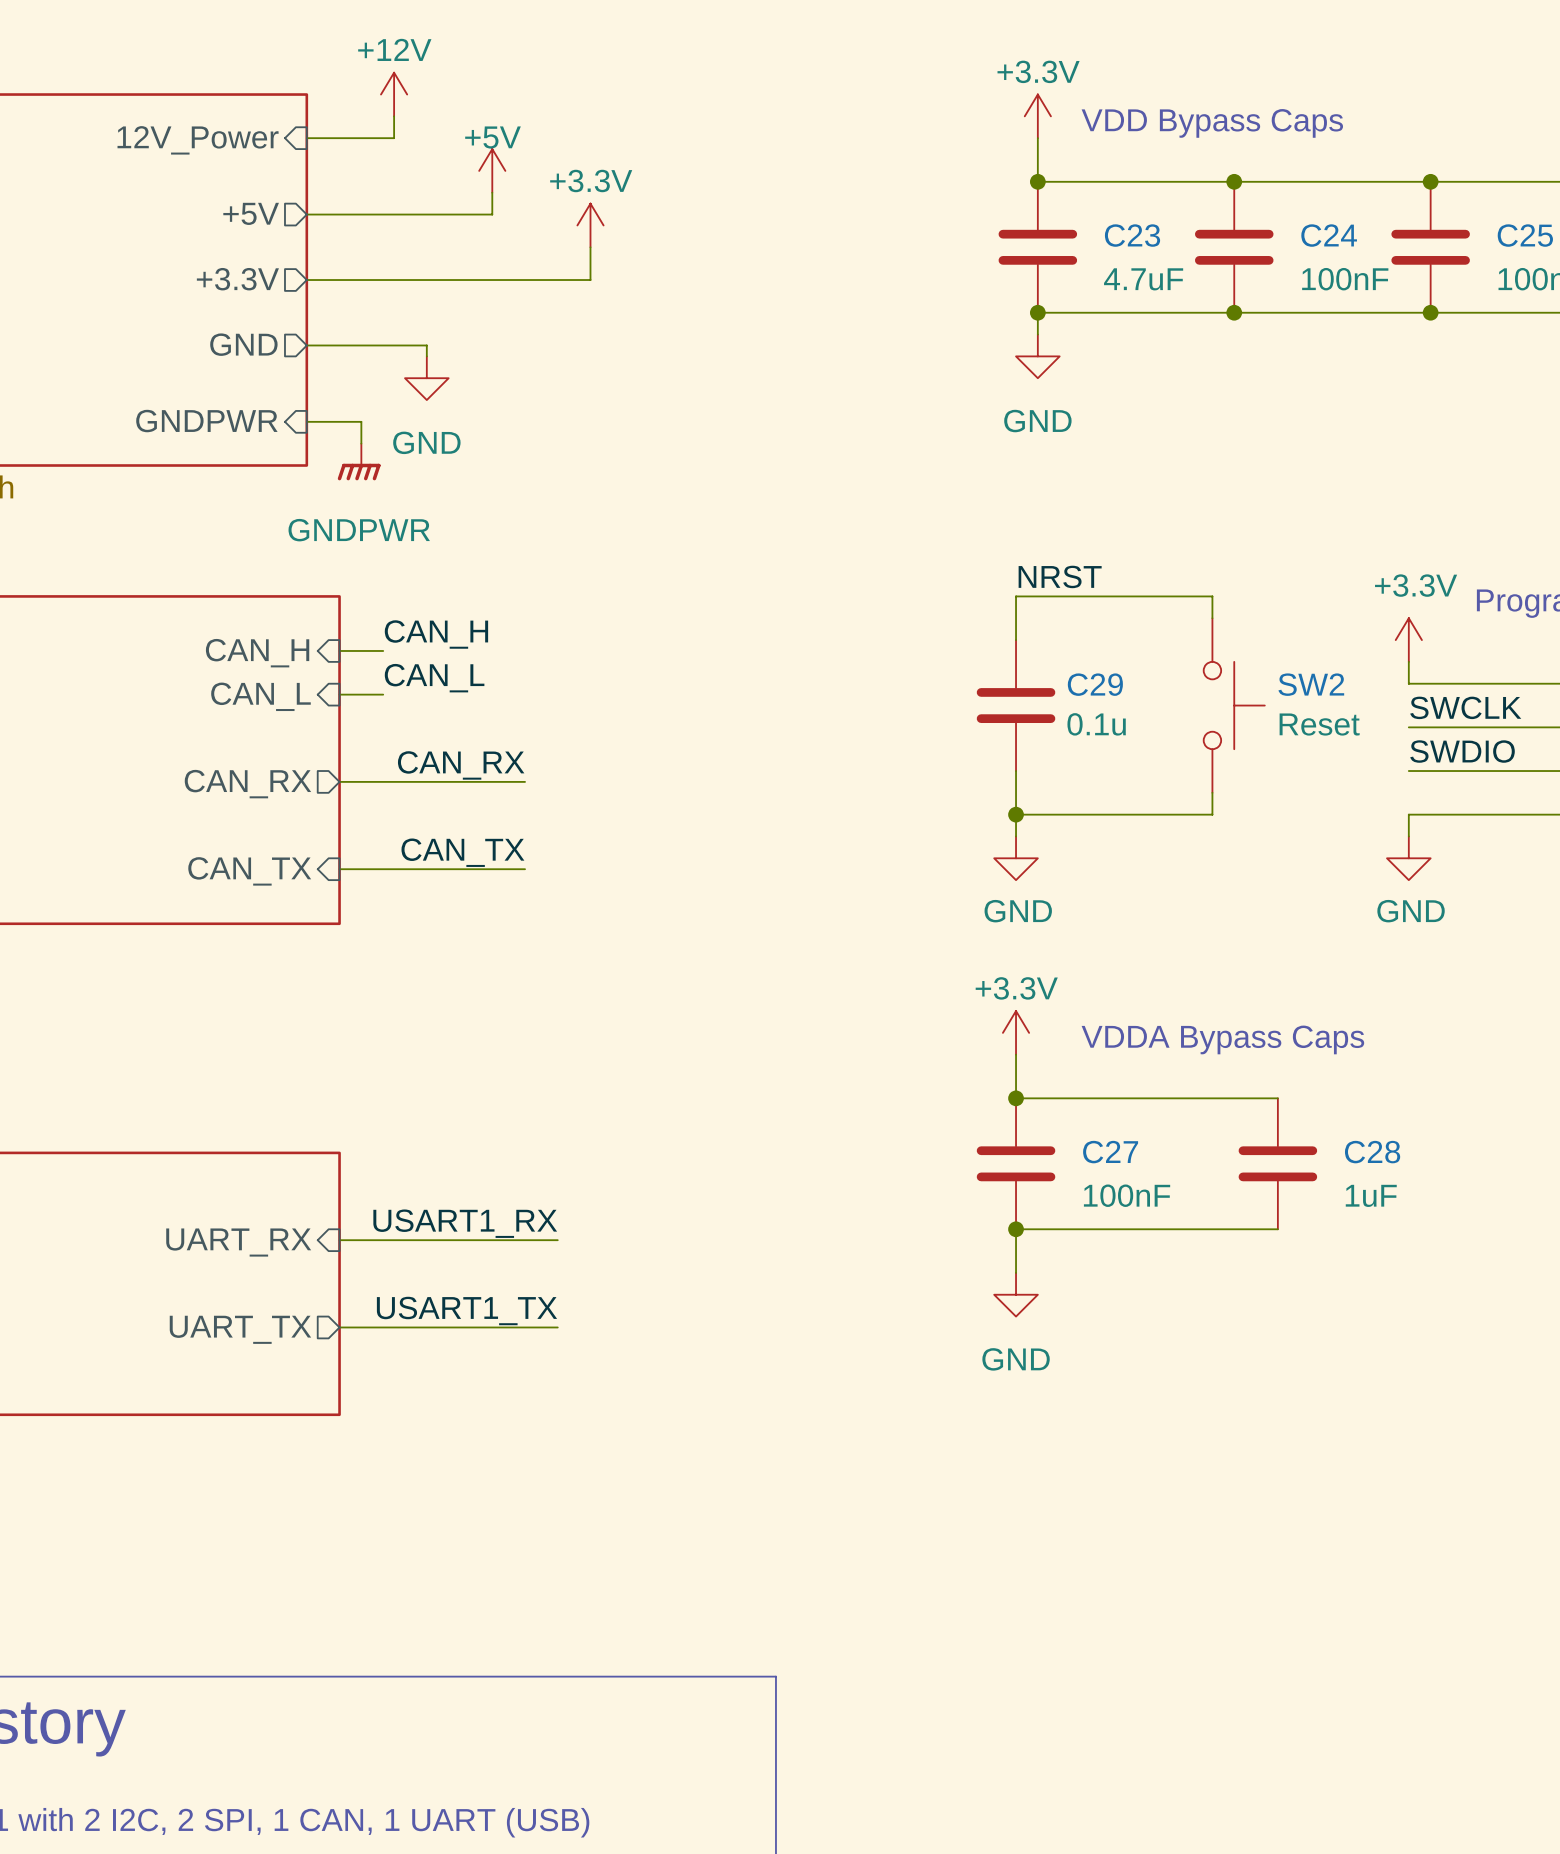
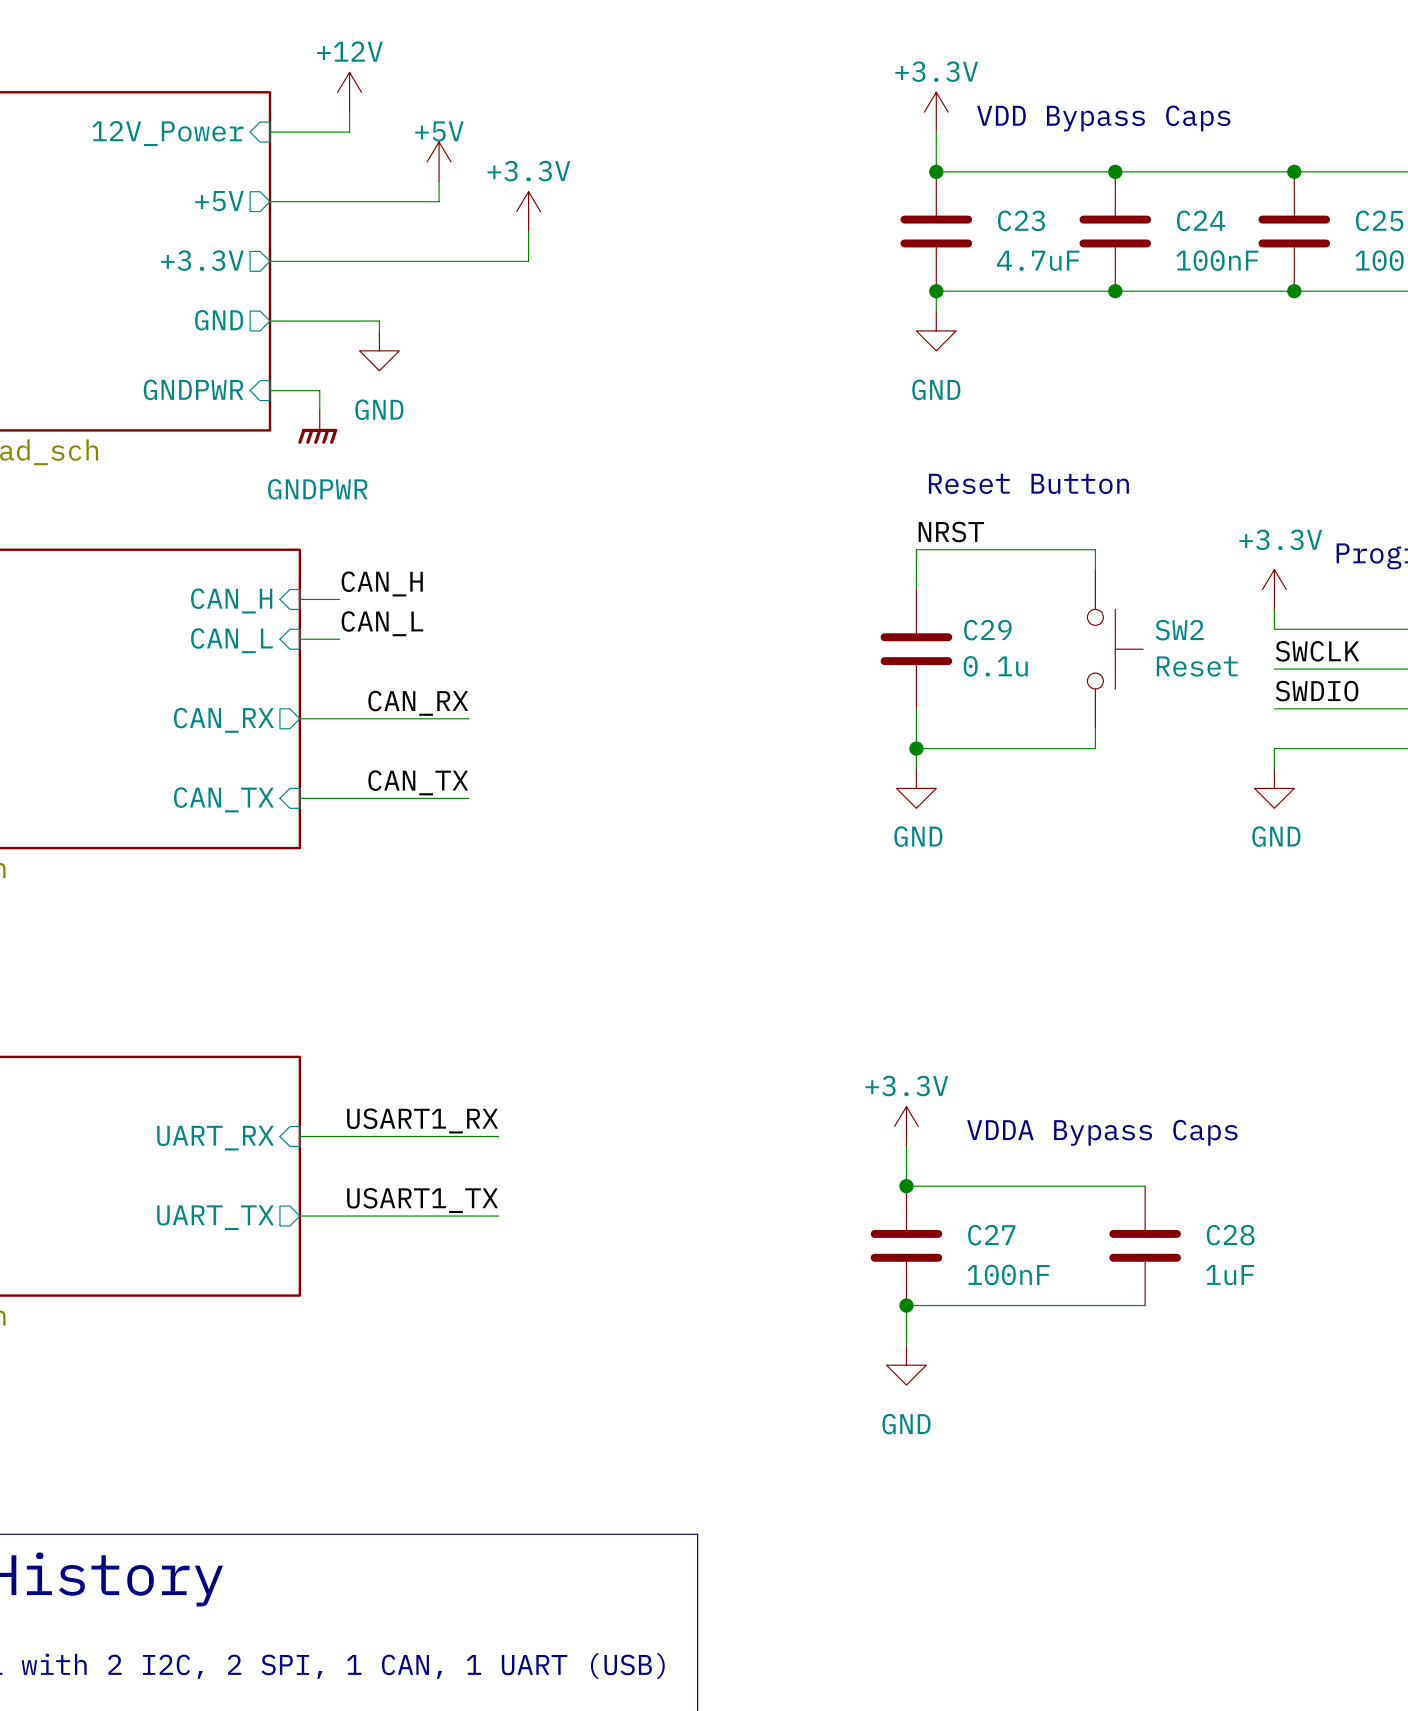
text: none -> Reset Button (1028, 483)
power symbol position: +3.3V (1016, 1032) -> +3.3V (906, 1126)
text position: VDDA Bypass Caps (1222, 1039) -> VDDA Bypass Caps (1102, 1132)
wire: (1016, 1054) (1016, 1098) (1277, 1098) -> (906, 1146) (906, 1186) (1145, 1186)
junction: (1016, 1098) -> none
C27 position: (1016, 1163) -> (906, 1245)
C28 position: (1277, 1163) -> (1145, 1245)
junction position: (1016, 1229) -> (906, 1186)
wire: (1277, 1229) (1016, 1229) (1016, 1272) -> (1145, 1305) (906, 1305) (906, 1345)
power symbol position: GND (1016, 1294) -> GND (906, 1365)
junction: none -> (906, 1305)

